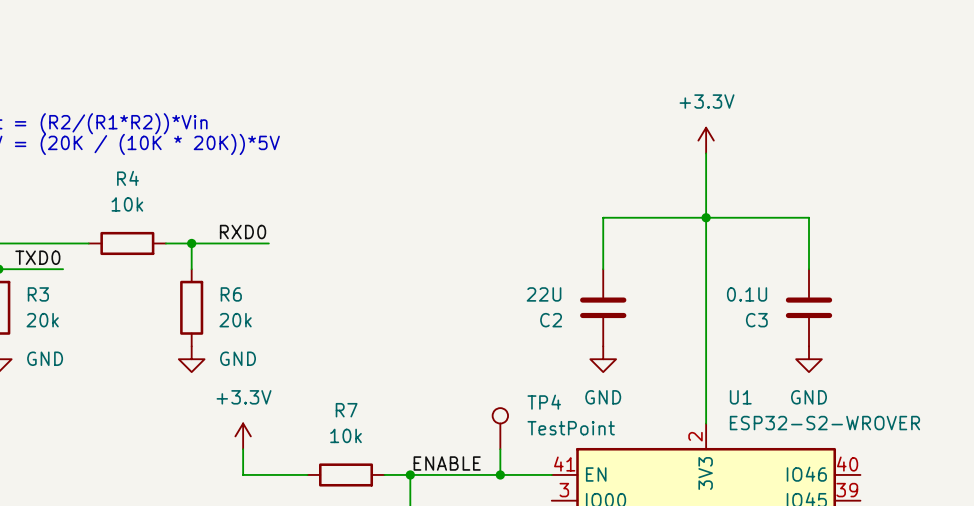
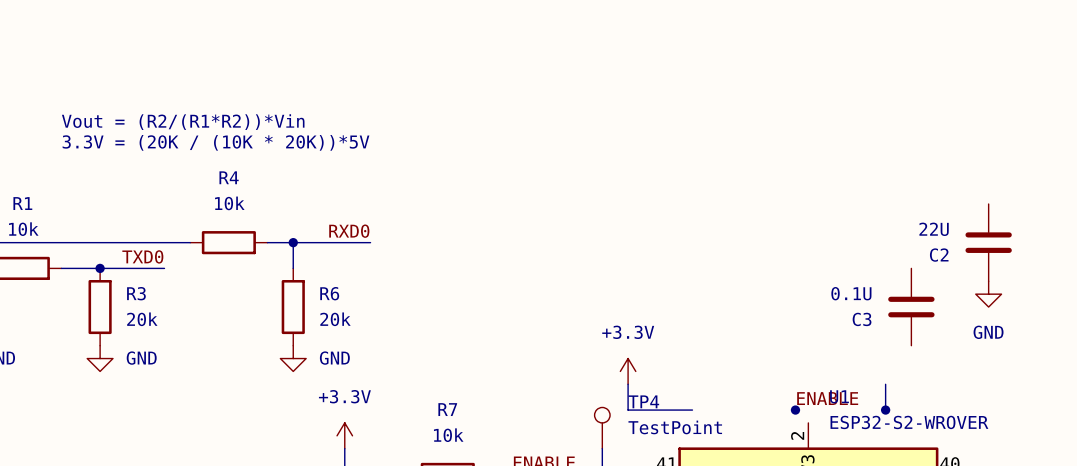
power symbol: +3.3V (706, 140) -> none
wire: (706, 153) (706, 423) -> none
junction: (706, 217) -> none
wire: (603, 269) (603, 217) (809, 217) (809, 269) -> none
C2 position: (603, 307) -> (988, 242)
power symbol: GND (603, 359) -> none
power symbol position: GND (809, 359) -> GND (988, 294)
power symbol: none -> +3.3V (628, 371)
wire: none -> (628, 384) (628, 410) (692, 410)
wire: none -> (885, 384) (885, 410)
label: none -> ENABLE (827, 398)
junction: none -> (795, 410)
junction: none -> (885, 410)

